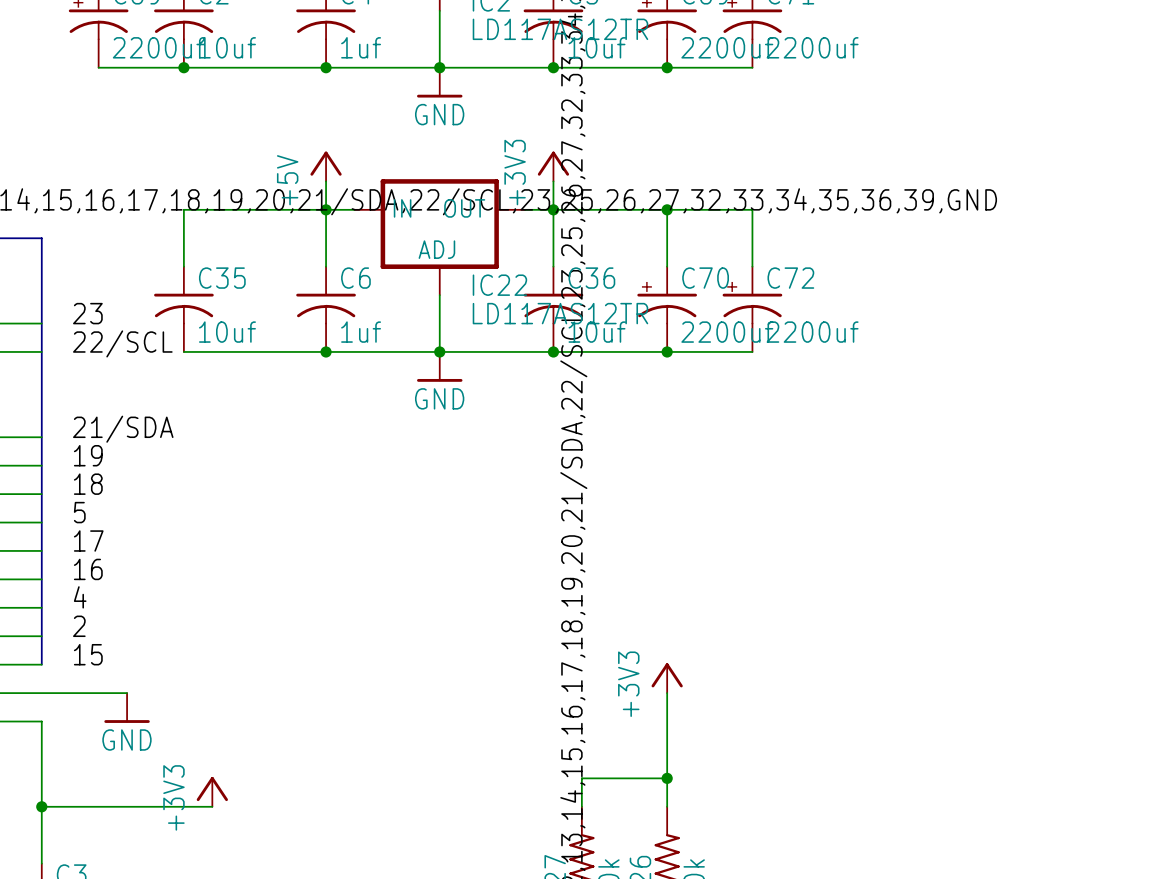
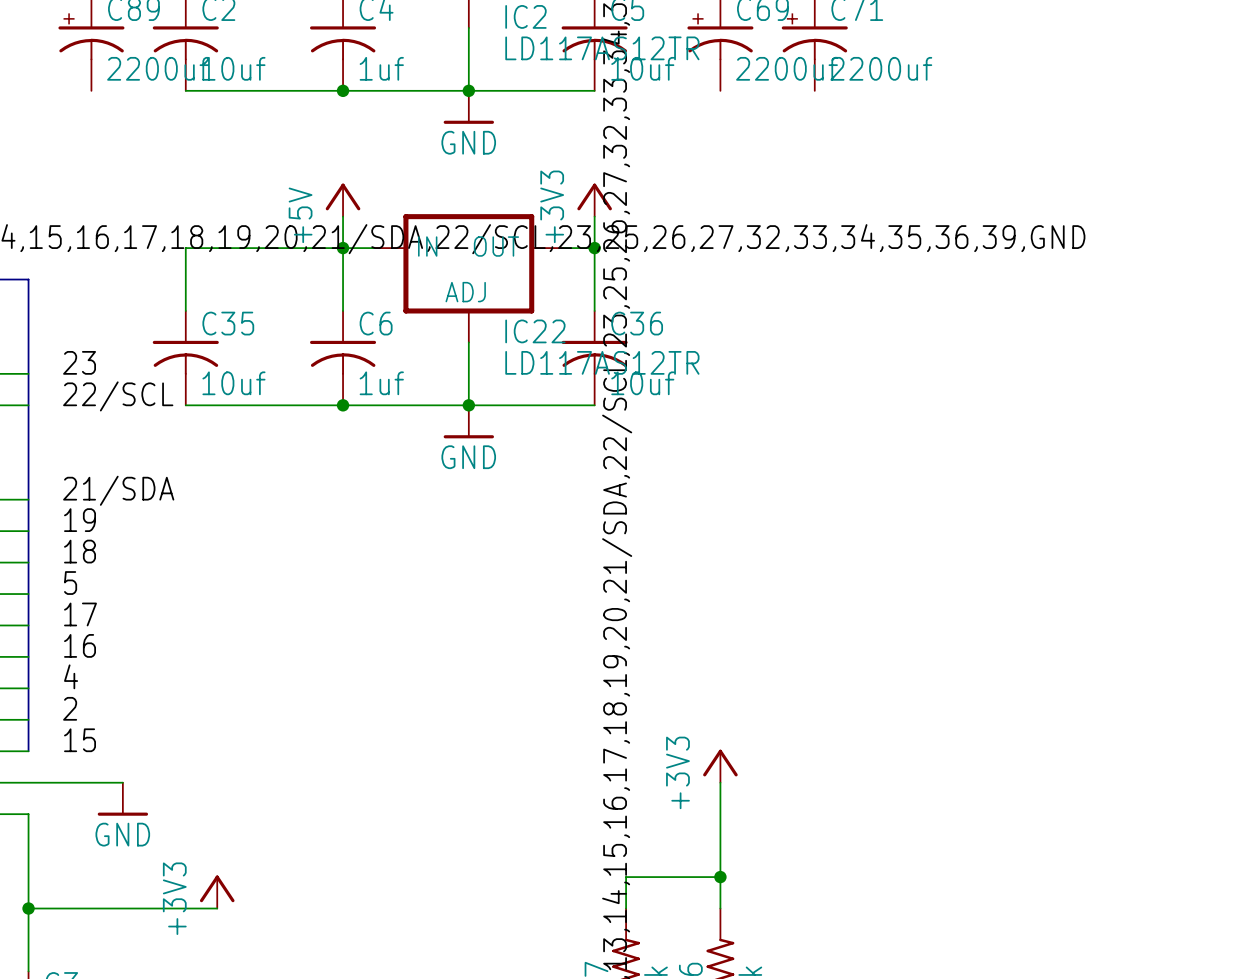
wire: (98, 67) (183, 67) -> none
junction: (183, 67) -> none
wire: (553, 67) (752, 67) -> none
junction: (553, 67) -> none
junction: (667, 67) -> none
wire: (553, 209) (752, 209) (752, 266) -> none
wire: (667, 209) (667, 266) -> none
junction: (667, 209) -> none
C70: 2200uf (667, 309) -> none
C72: 2200uf (752, 309) -> none
wire: (553, 351) (752, 351) -> none
junction: (553, 351) -> none
junction: (667, 351) -> none

